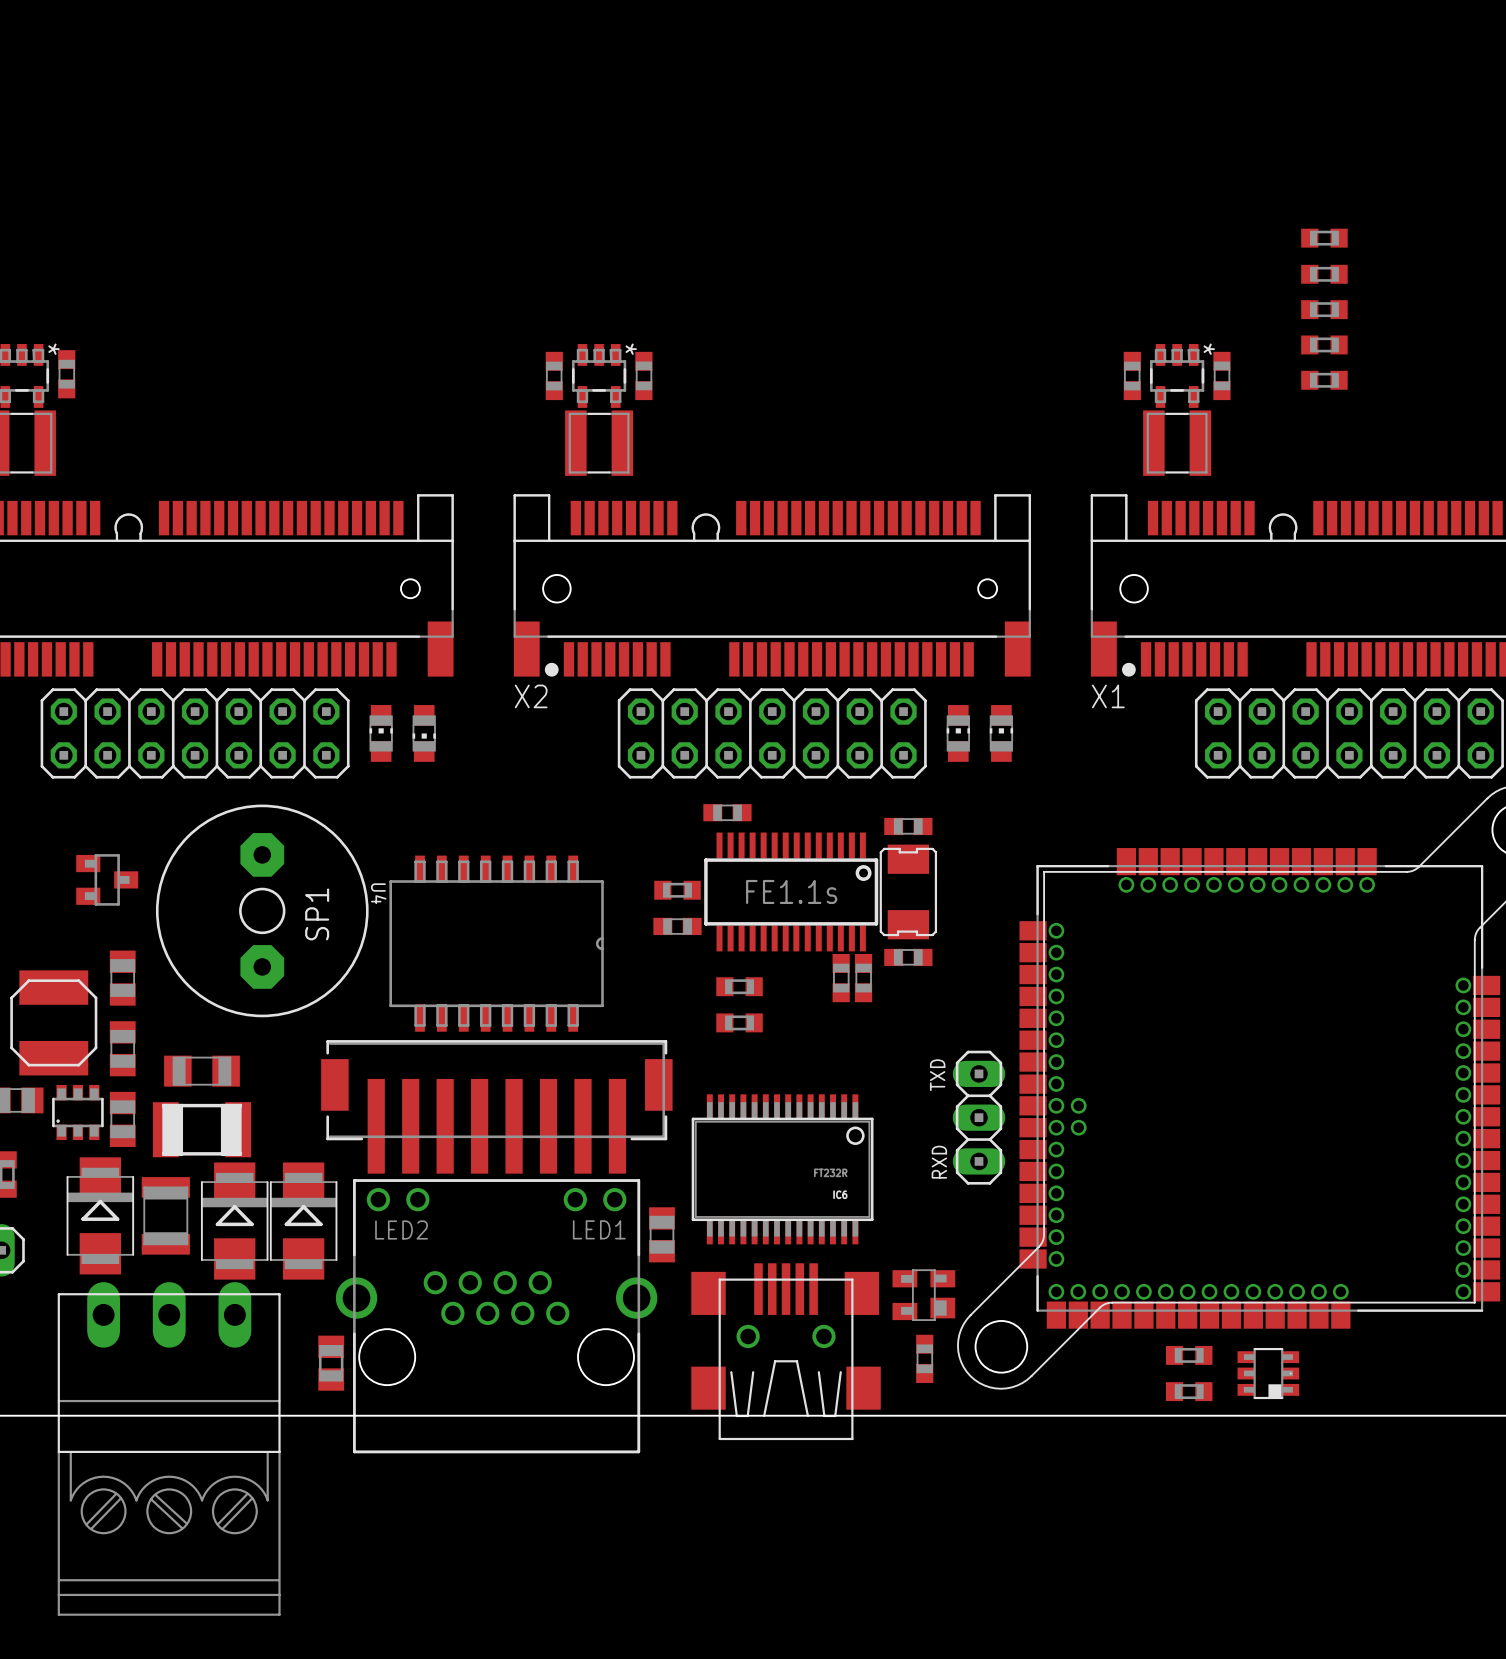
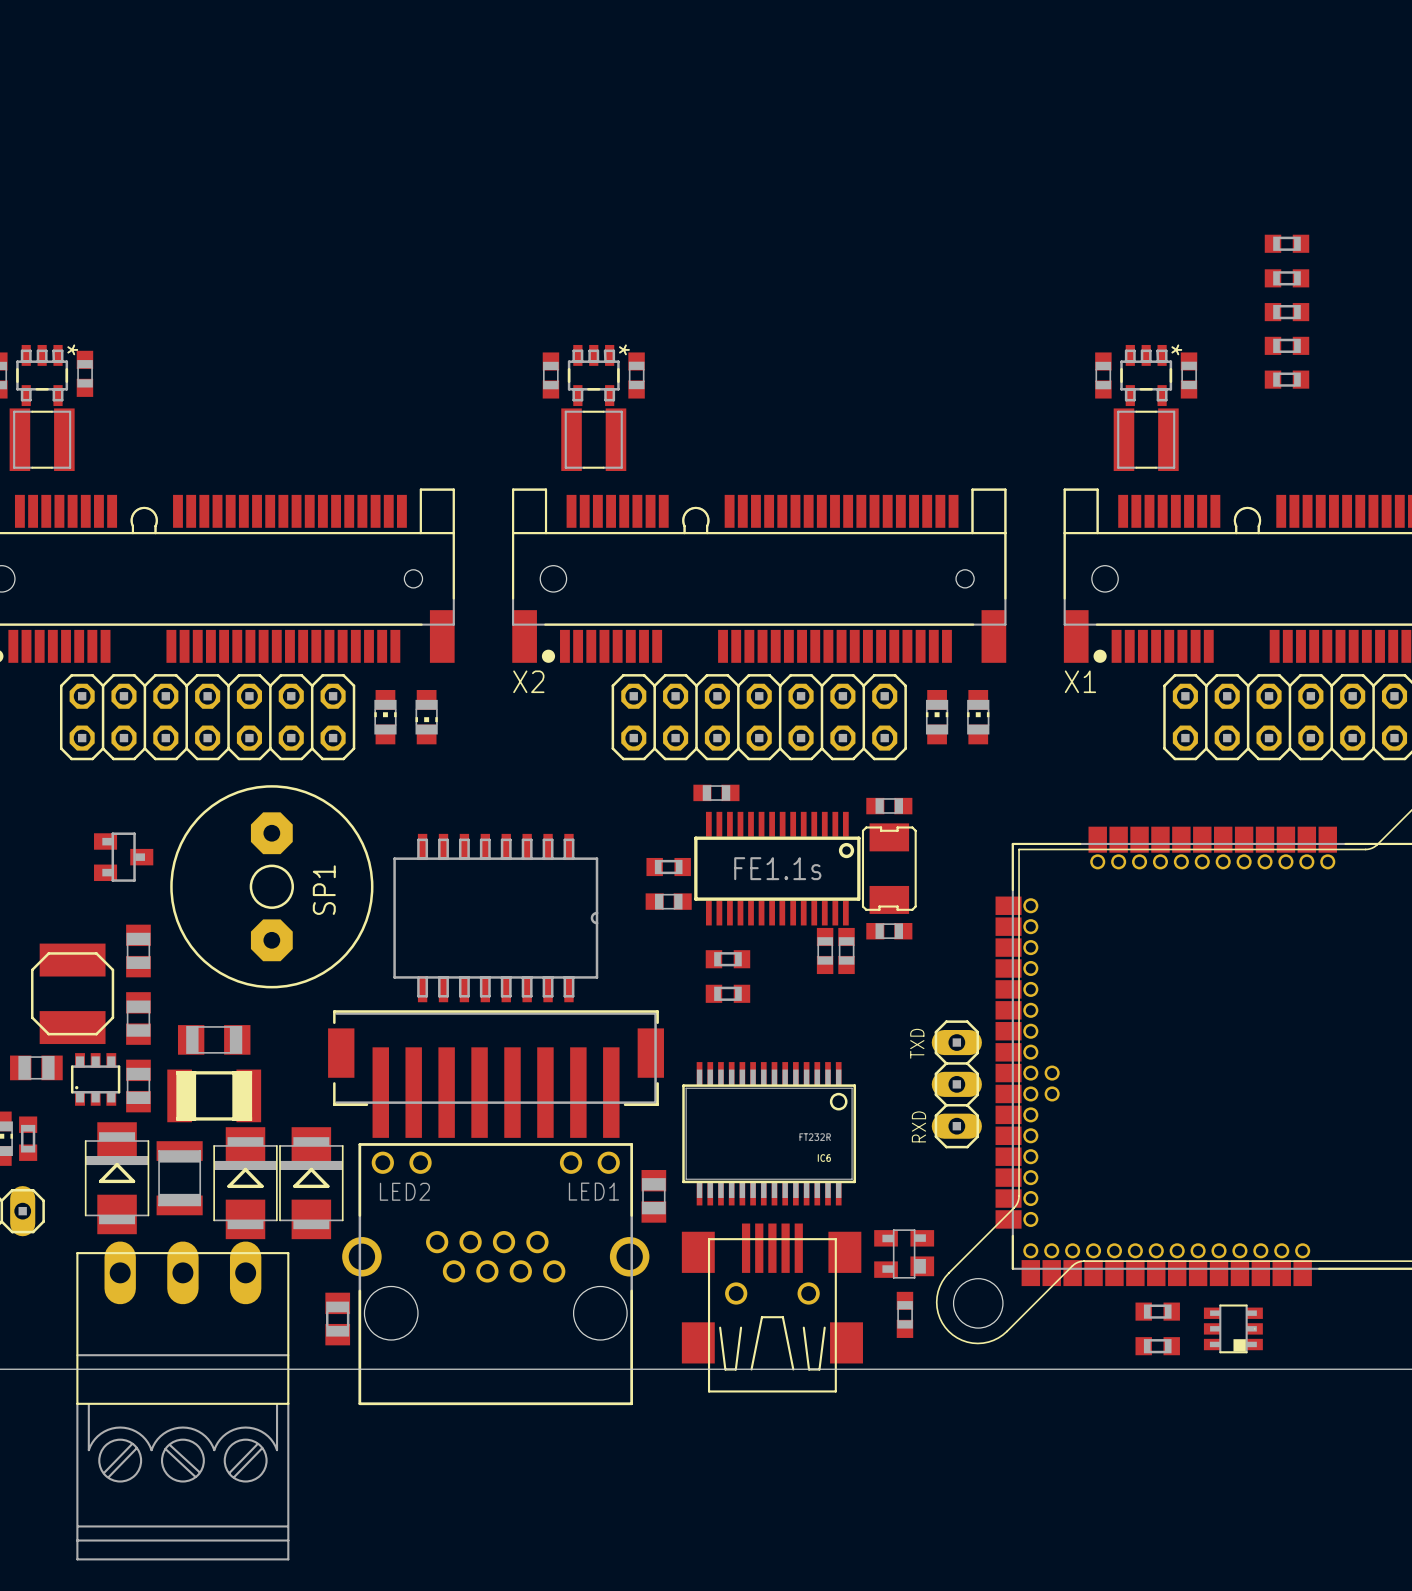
U4 name: U4 (378, 893) -> none

